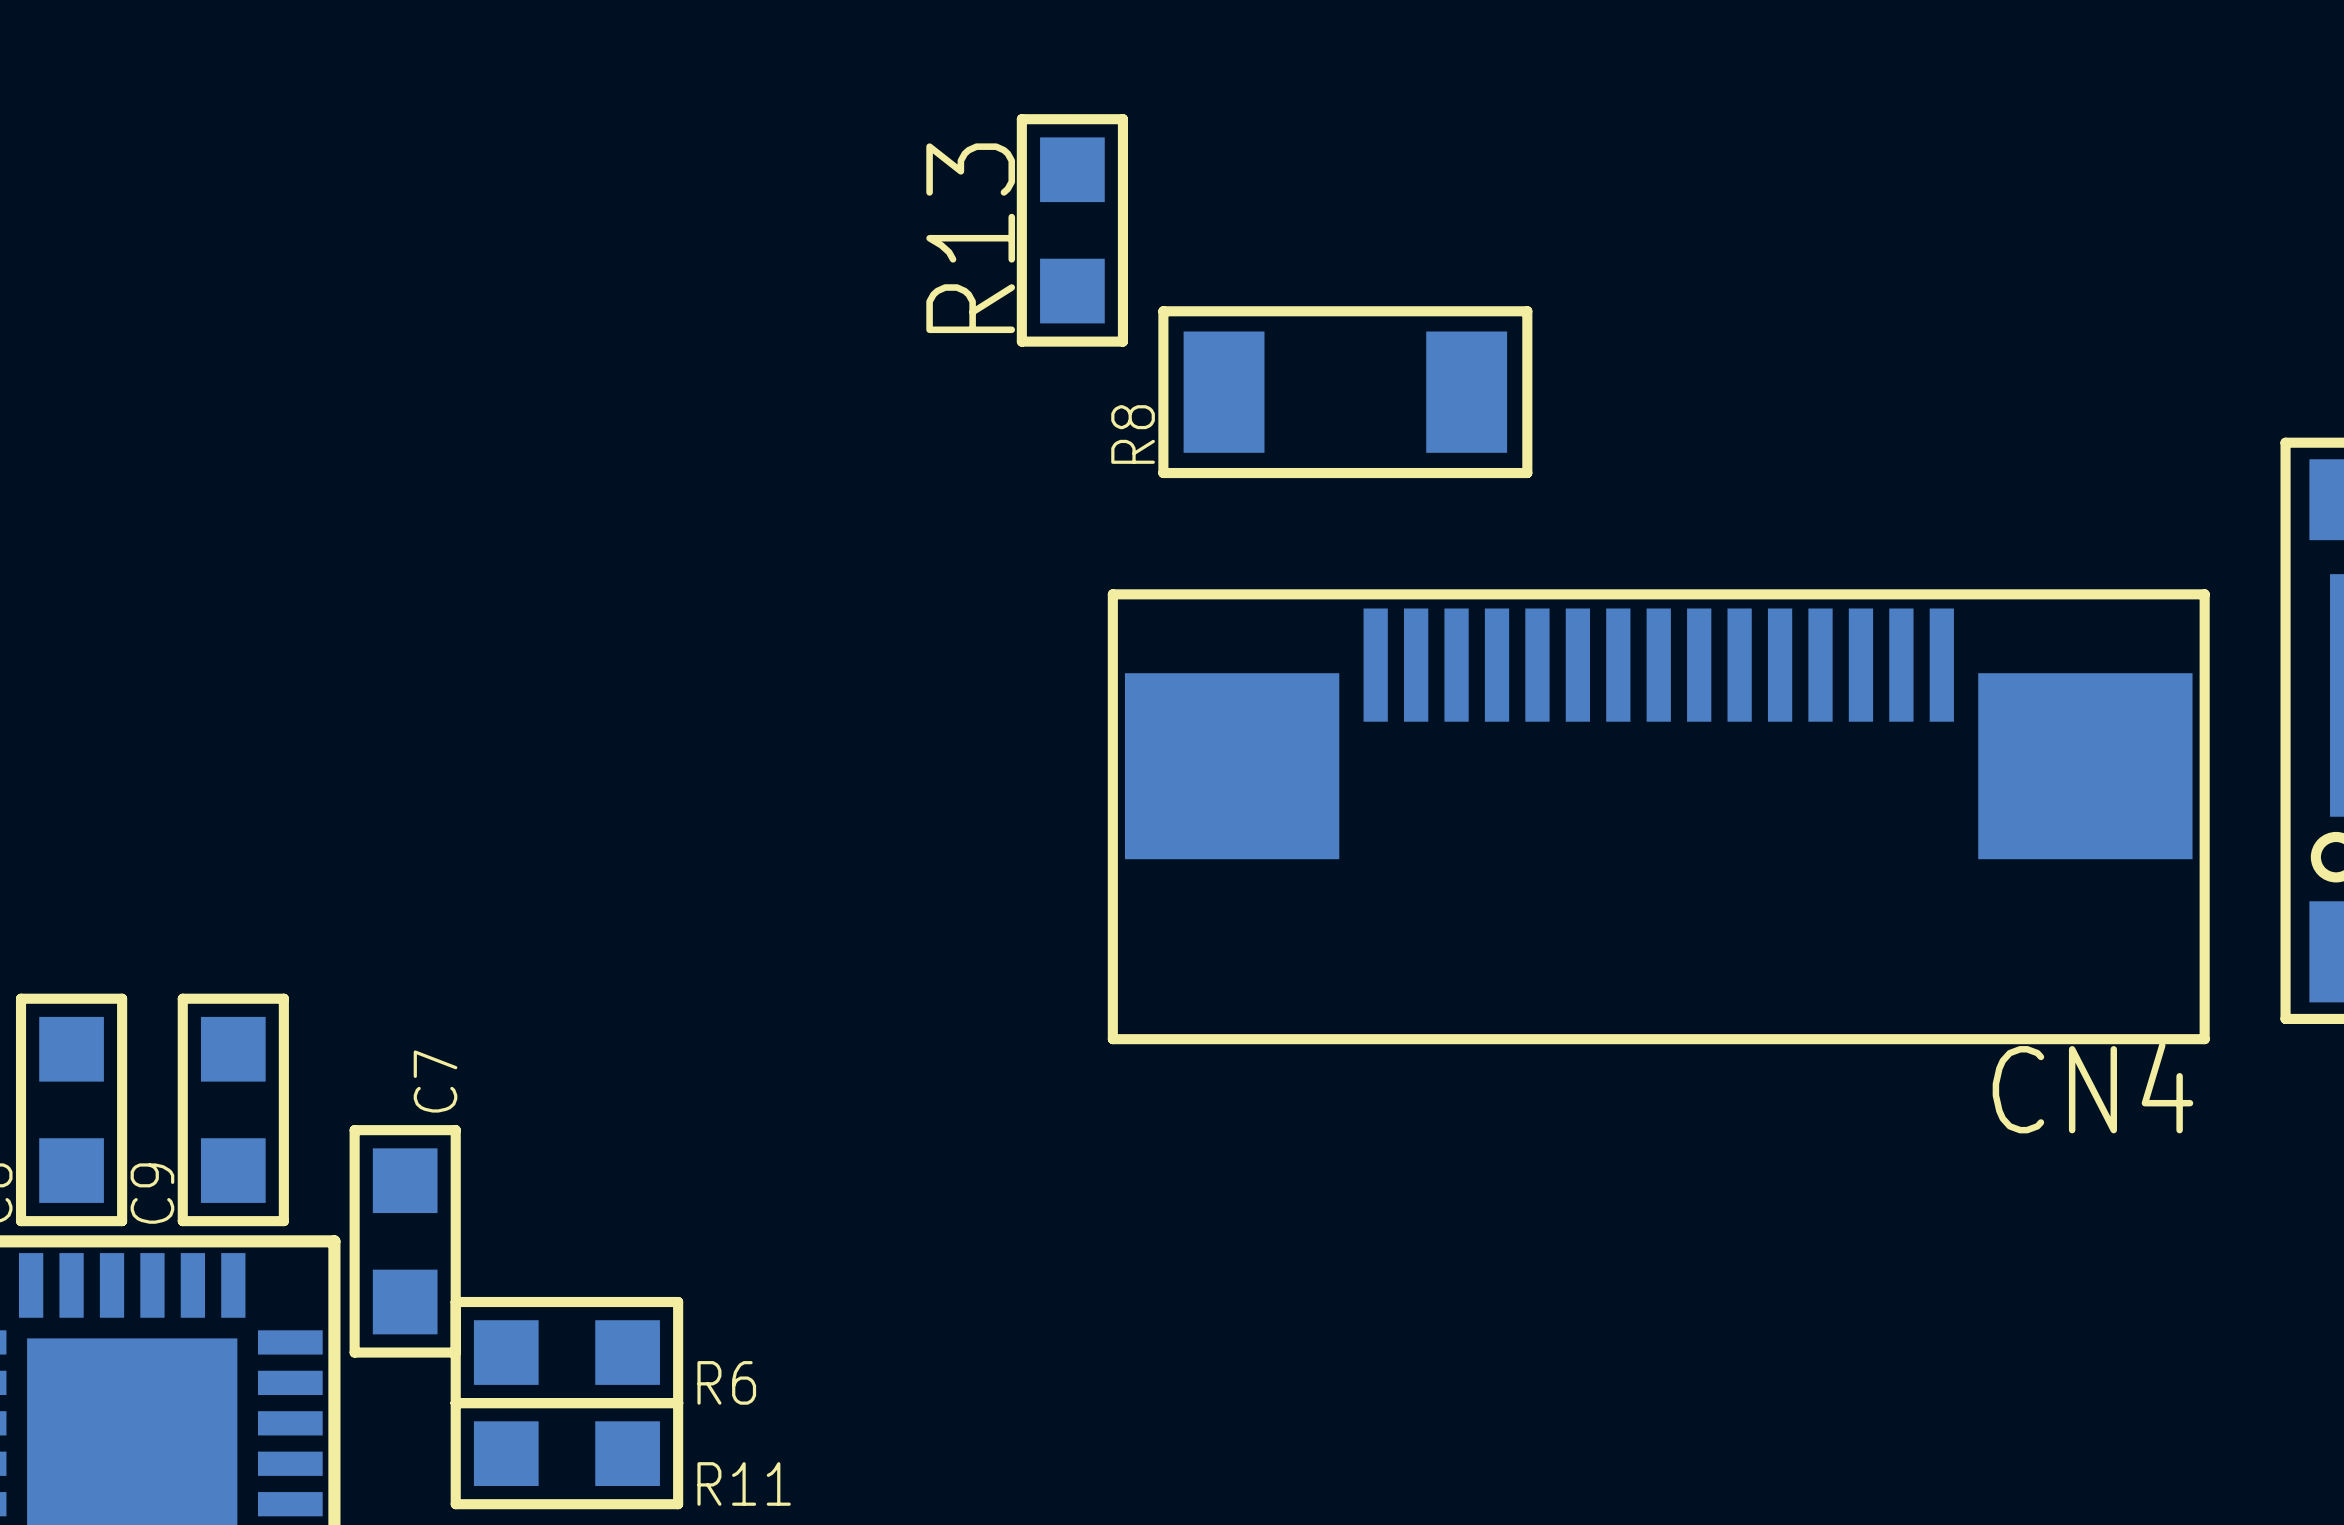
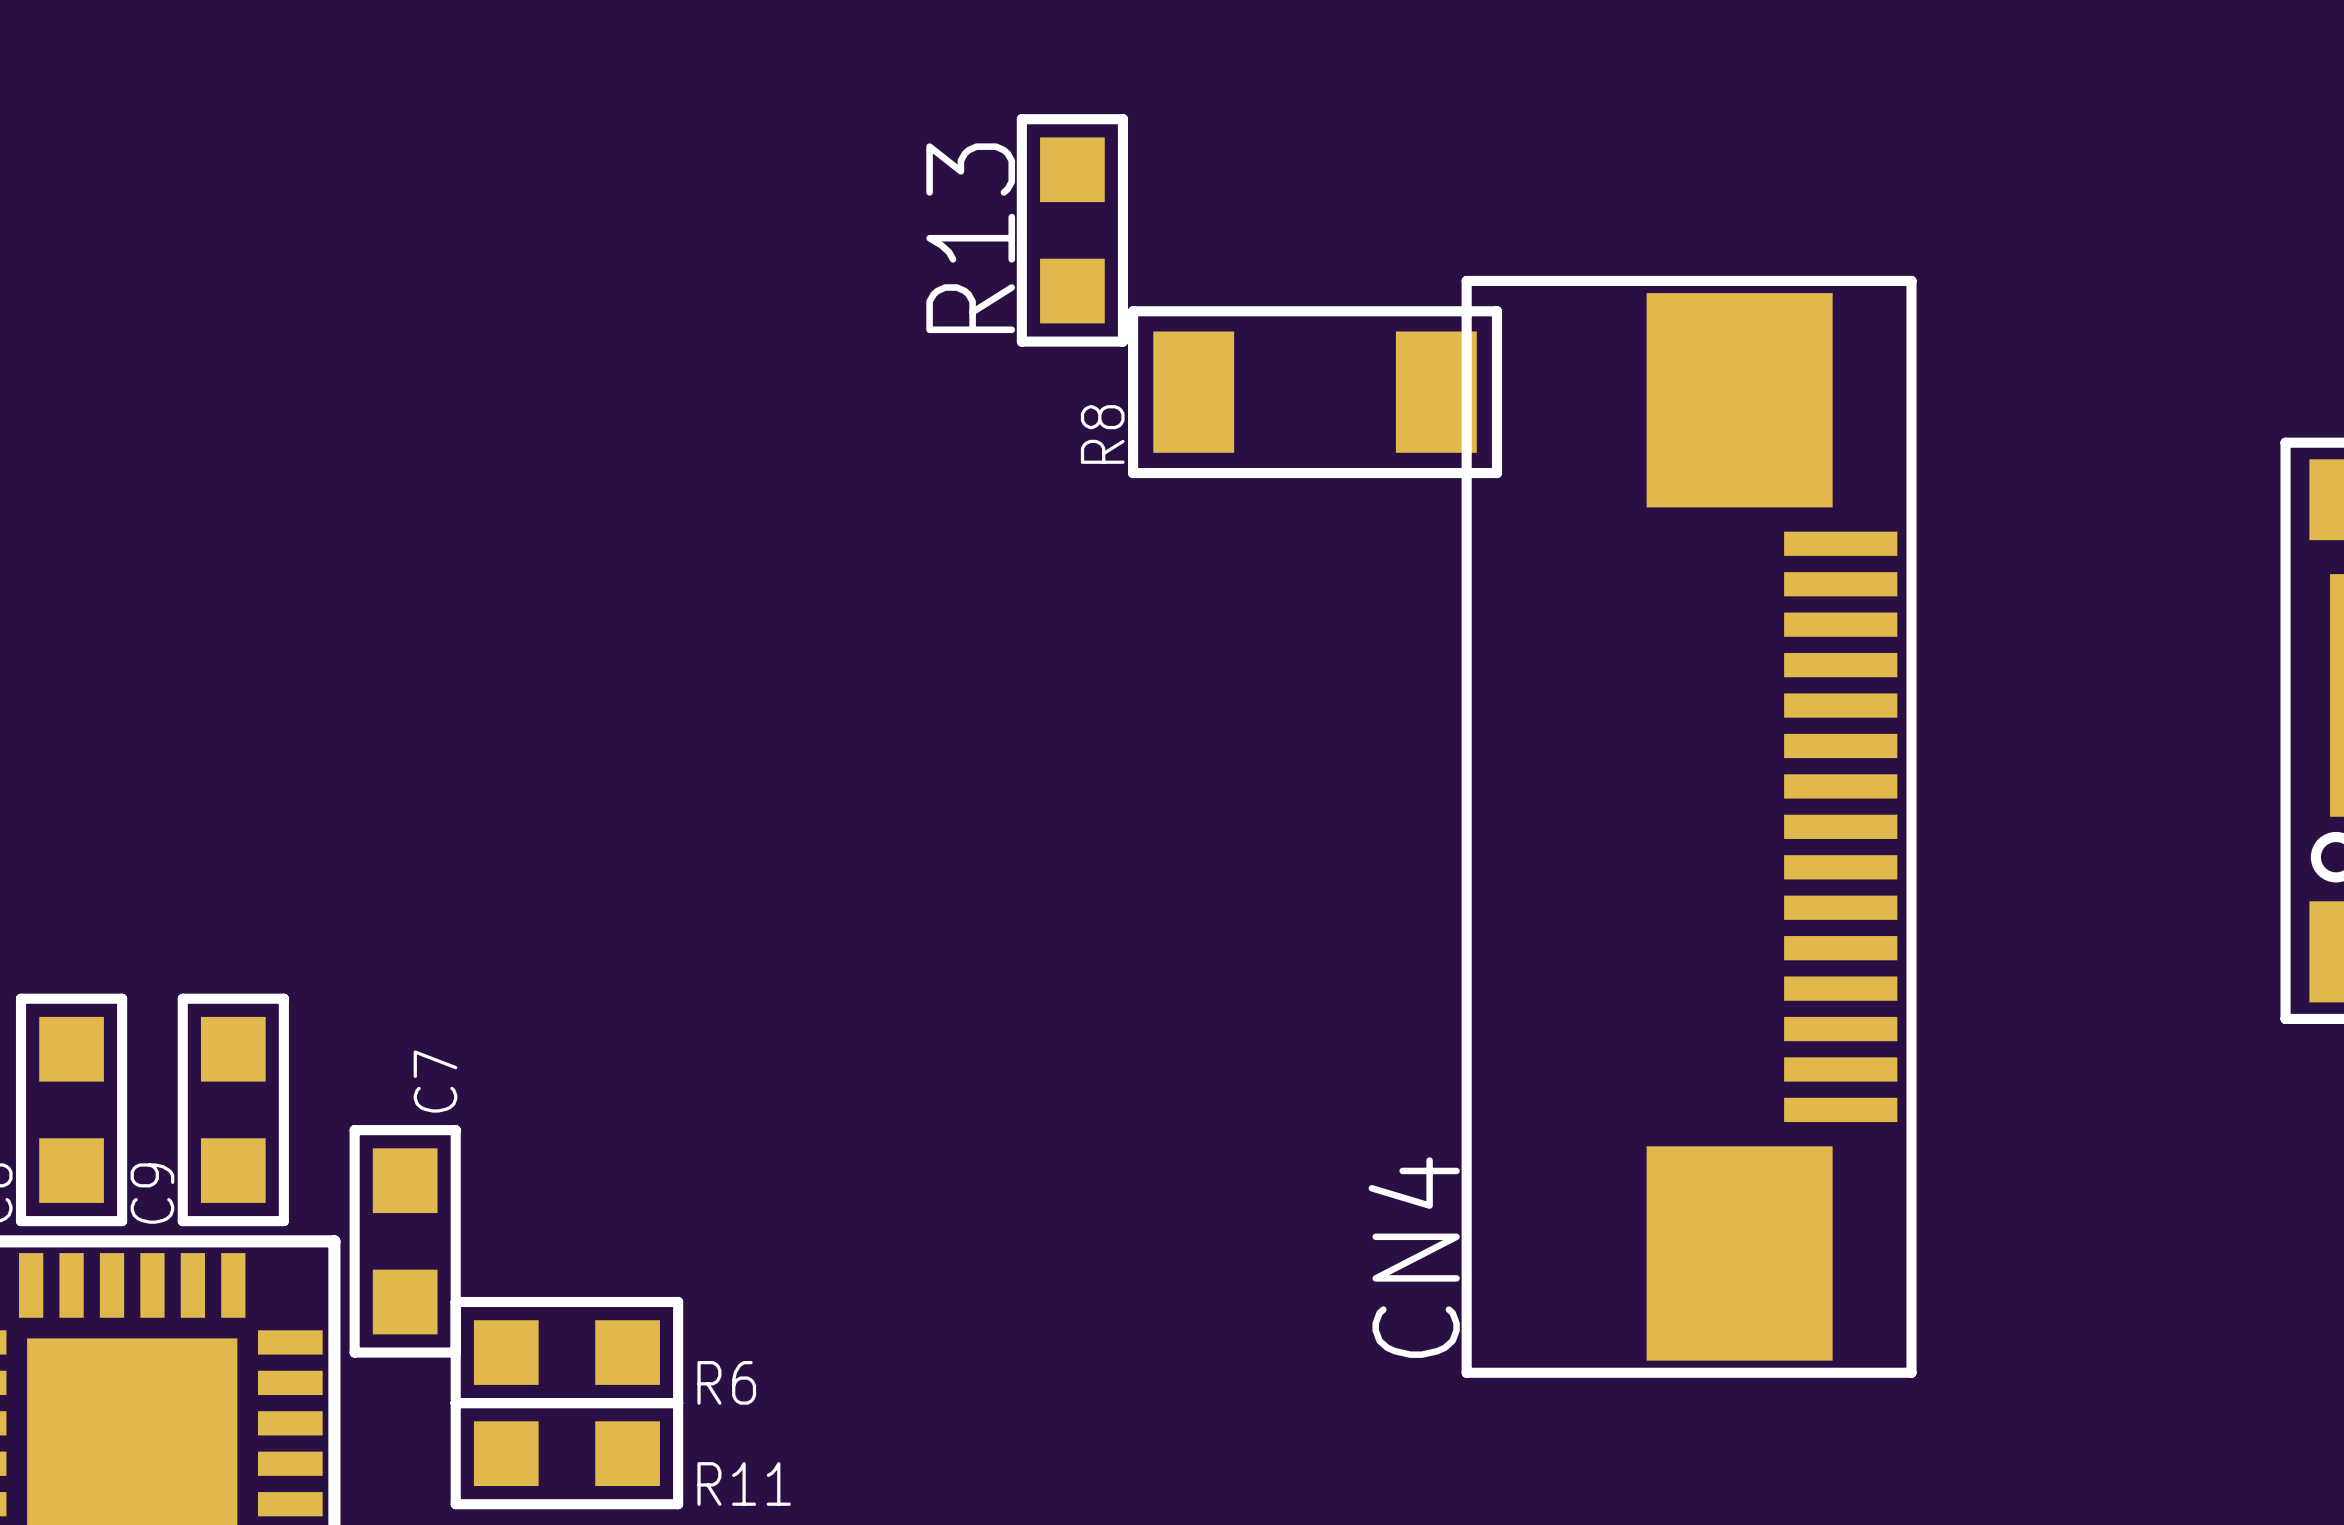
R8 position: (1345, 392) -> (1315, 392)
CN4 rotation: 0° (1658, 816) -> 90° clockwise (1689, 826)

